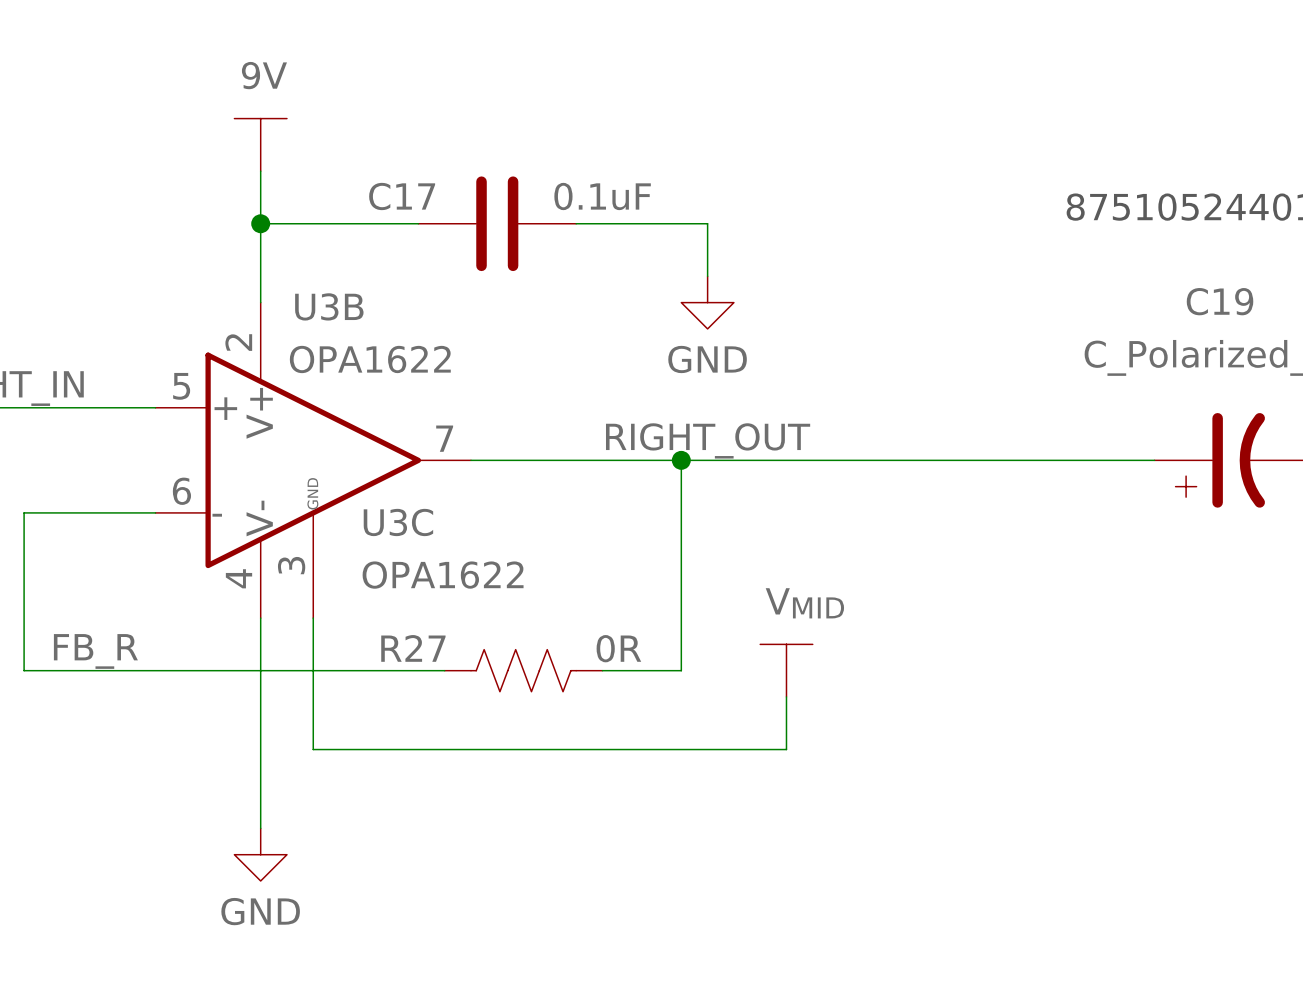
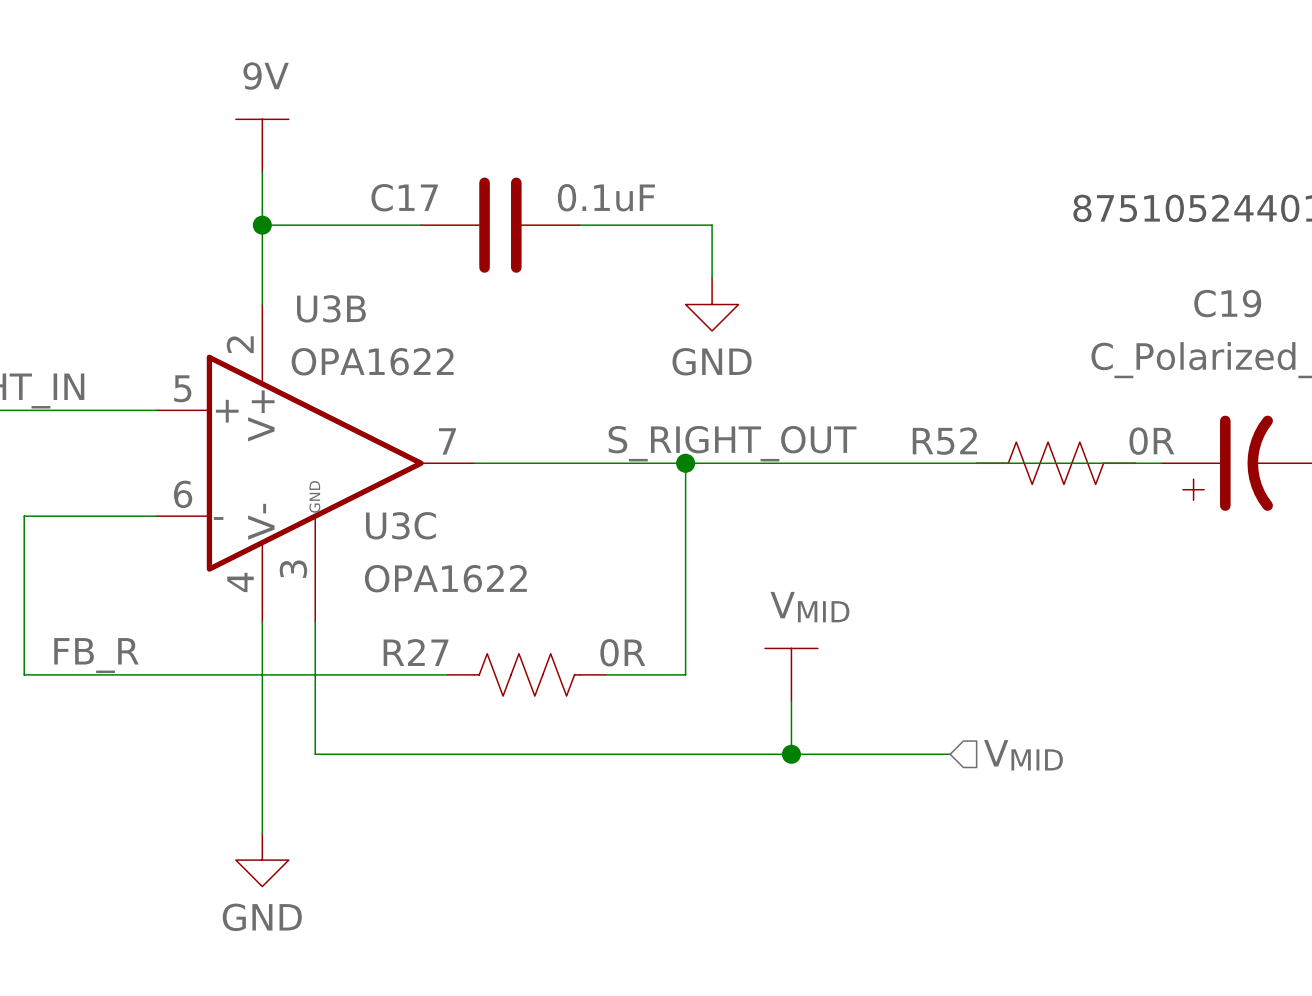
label: RIGHT_OUT (708, 440) -> S_RIGHT_OUT (732, 443)
R52: none -> 0R (1055, 463)
wire: none -> (791, 754) (950, 754)
junction: none -> (791, 754)
hierarchical label: none -> VMID (1023, 755)

